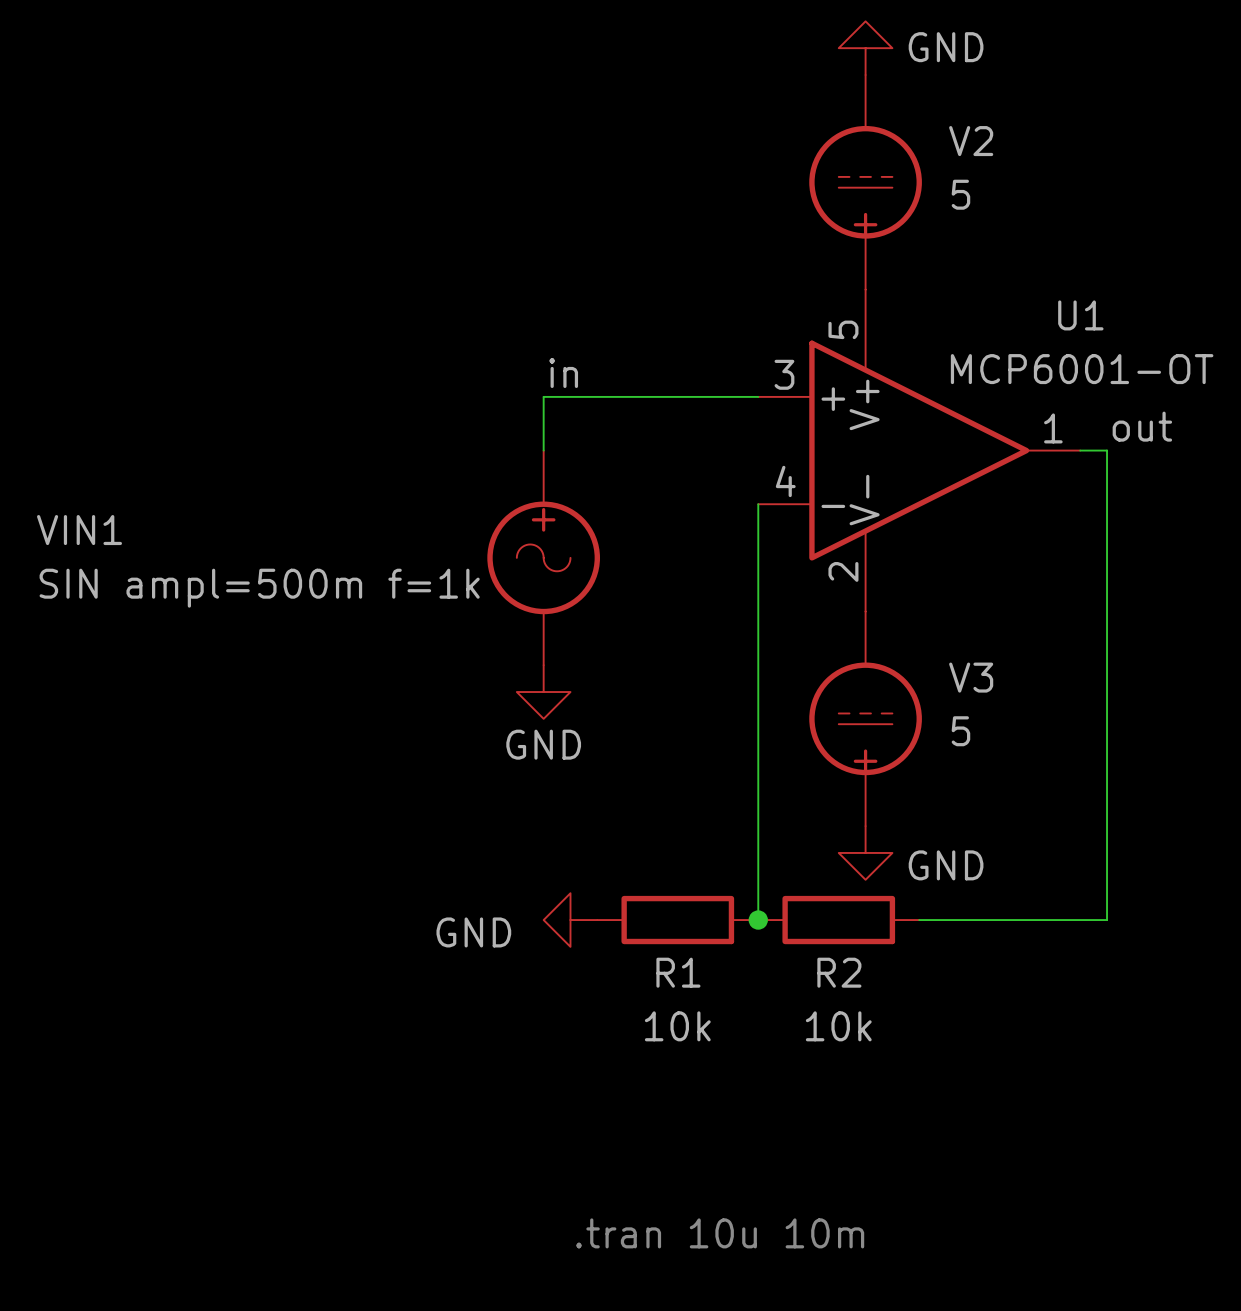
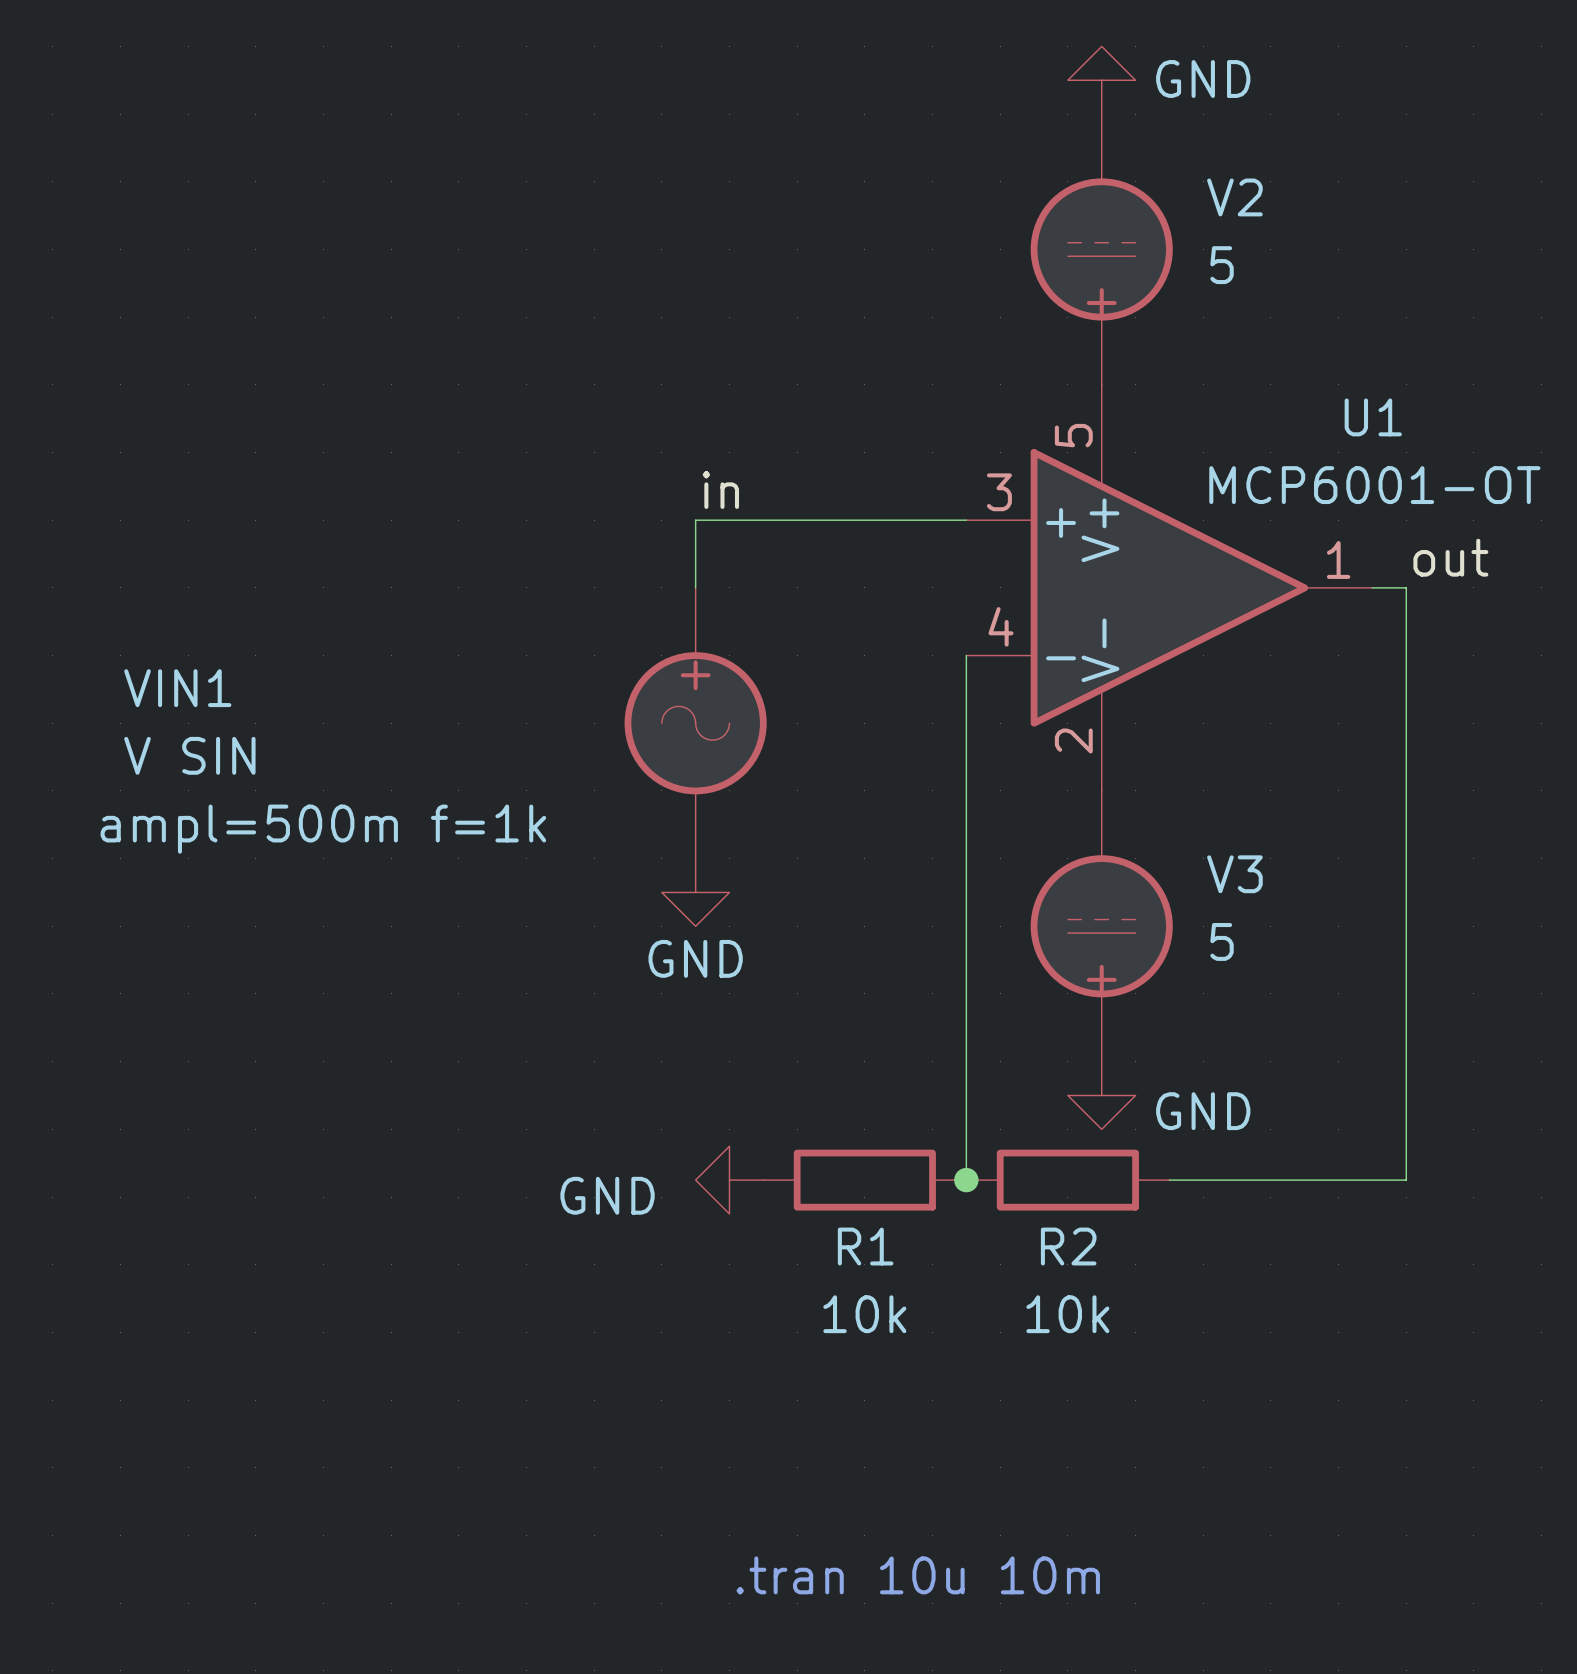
VIN1 name position: VIN1 (79, 530) -> VIN1 (177, 688)
VIN1 value: SIN ampl=500m f=1k (259, 588) -> V SIN (189, 755)
VIN1 text: none -> ampl=500m f=1k (323, 829)

